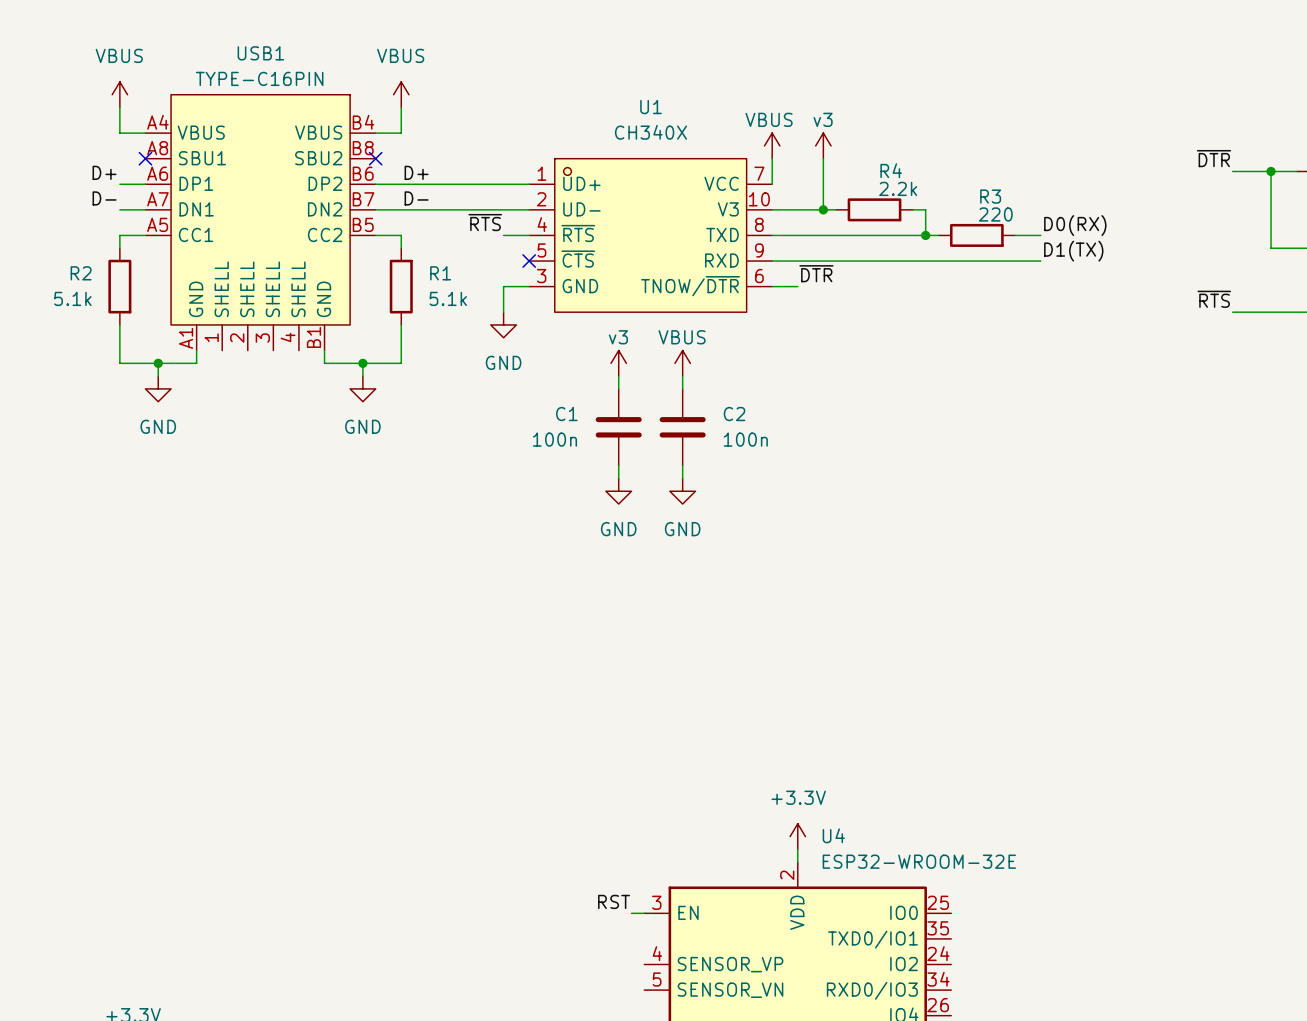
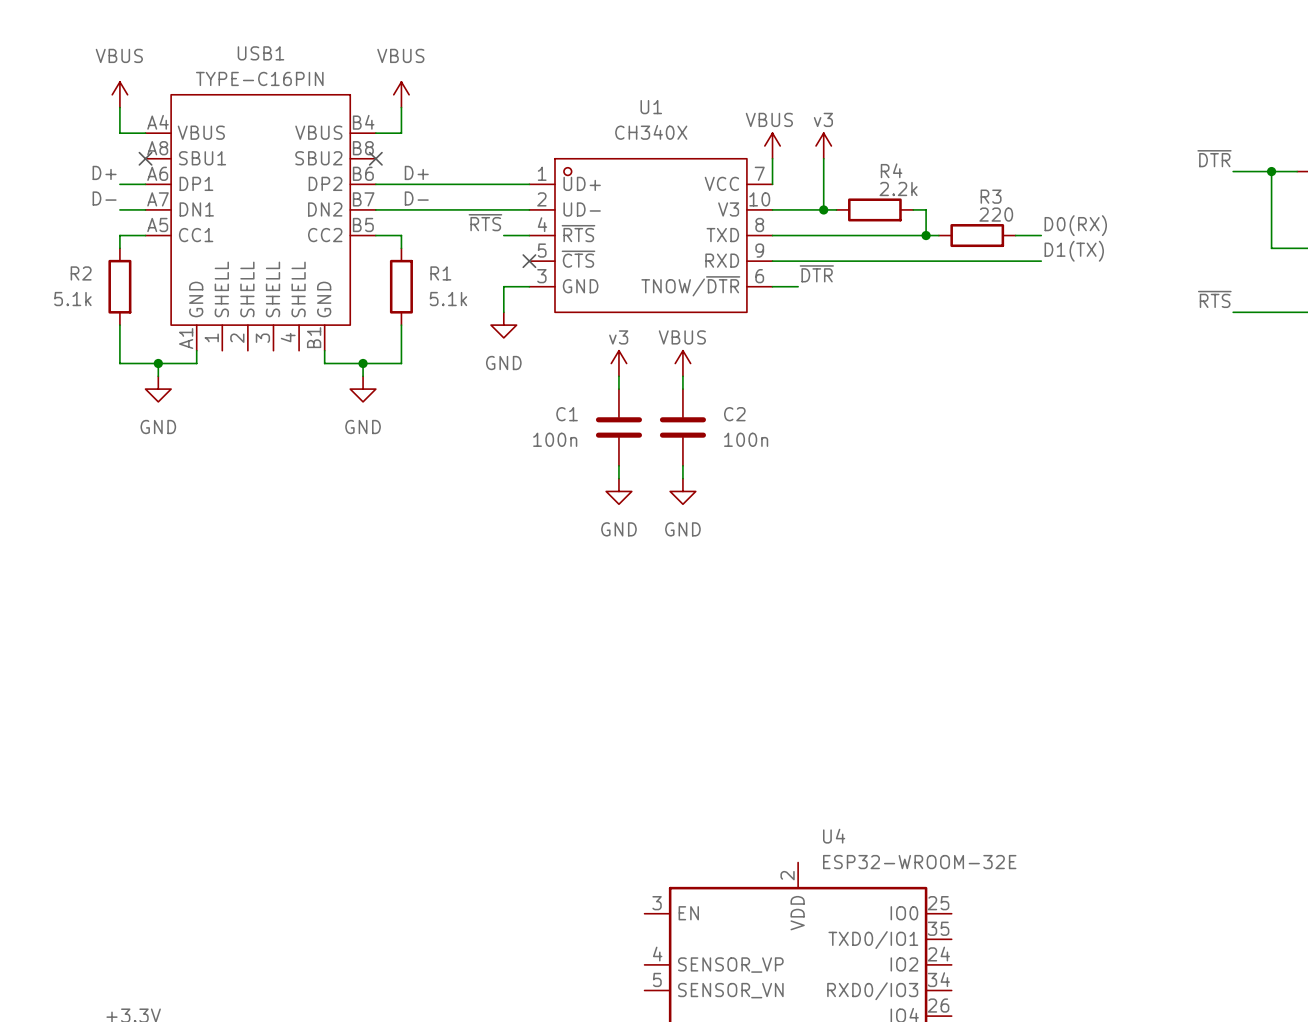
power symbol: +3.3V (797, 836) -> none
wire: (797, 849) (797, 862) -> none
label: RST (614, 901) -> none
wire: (631, 913) (644, 913) -> none

